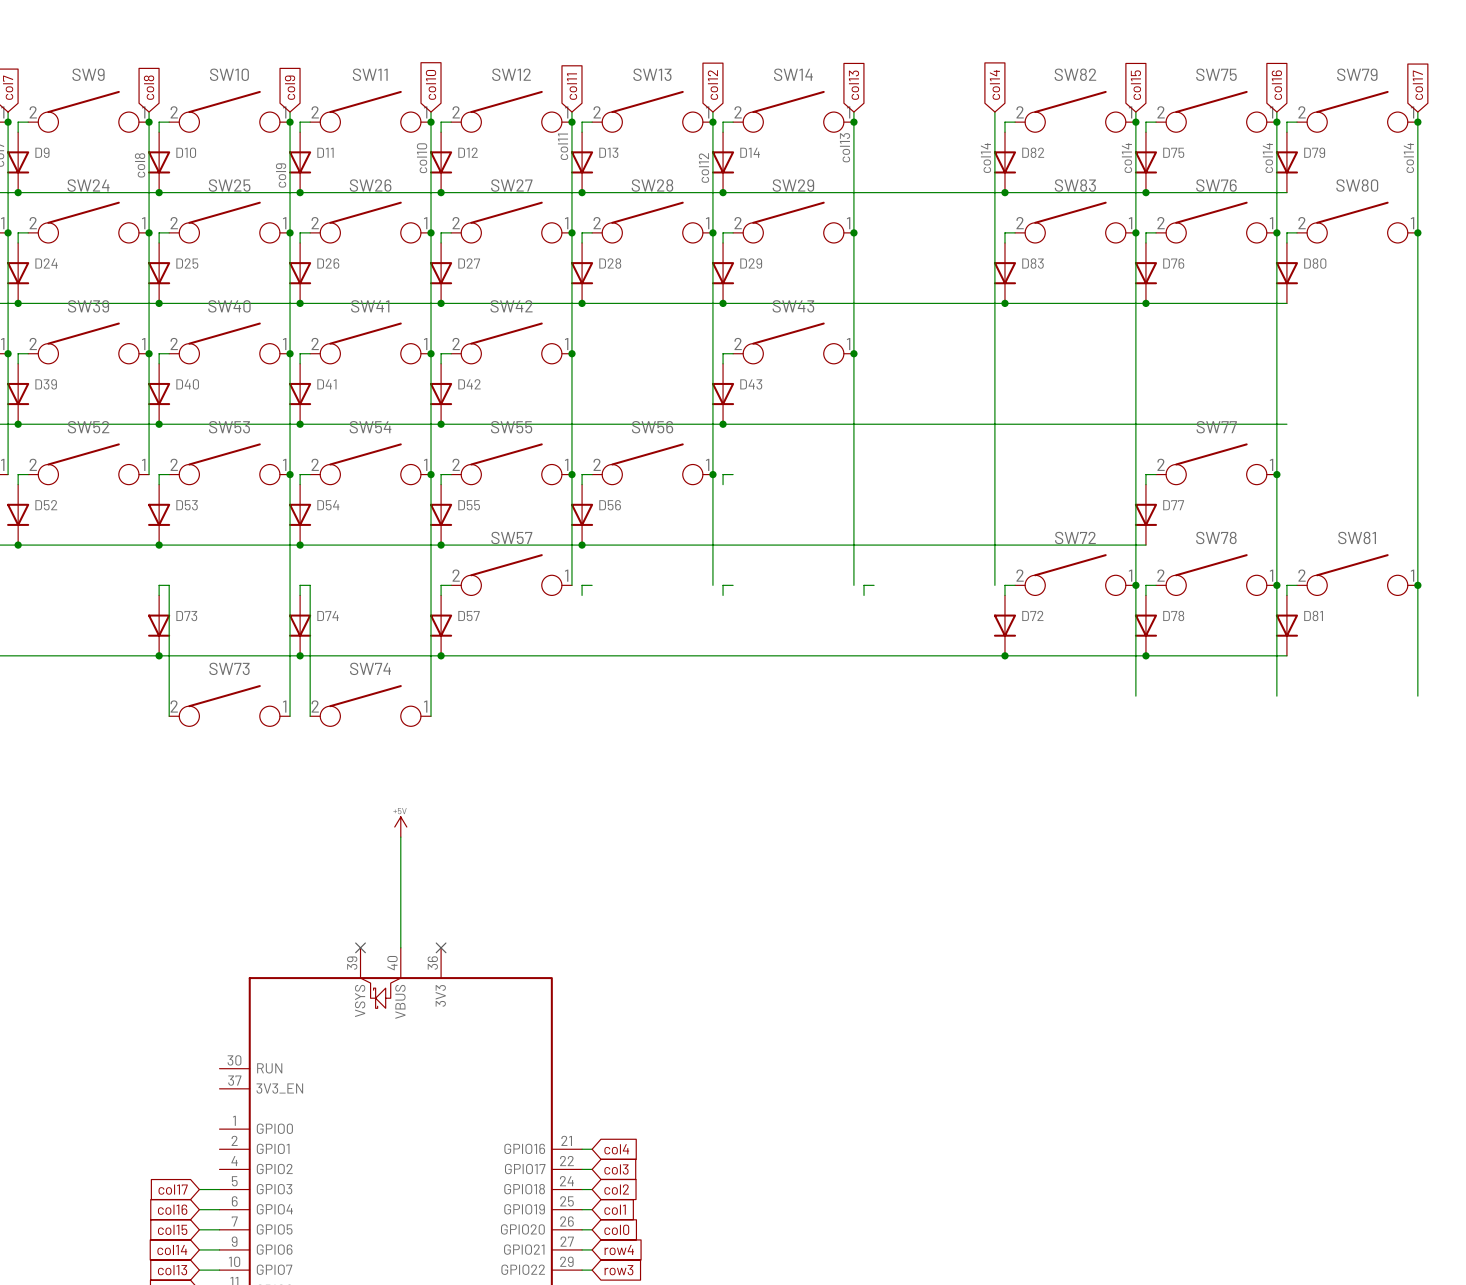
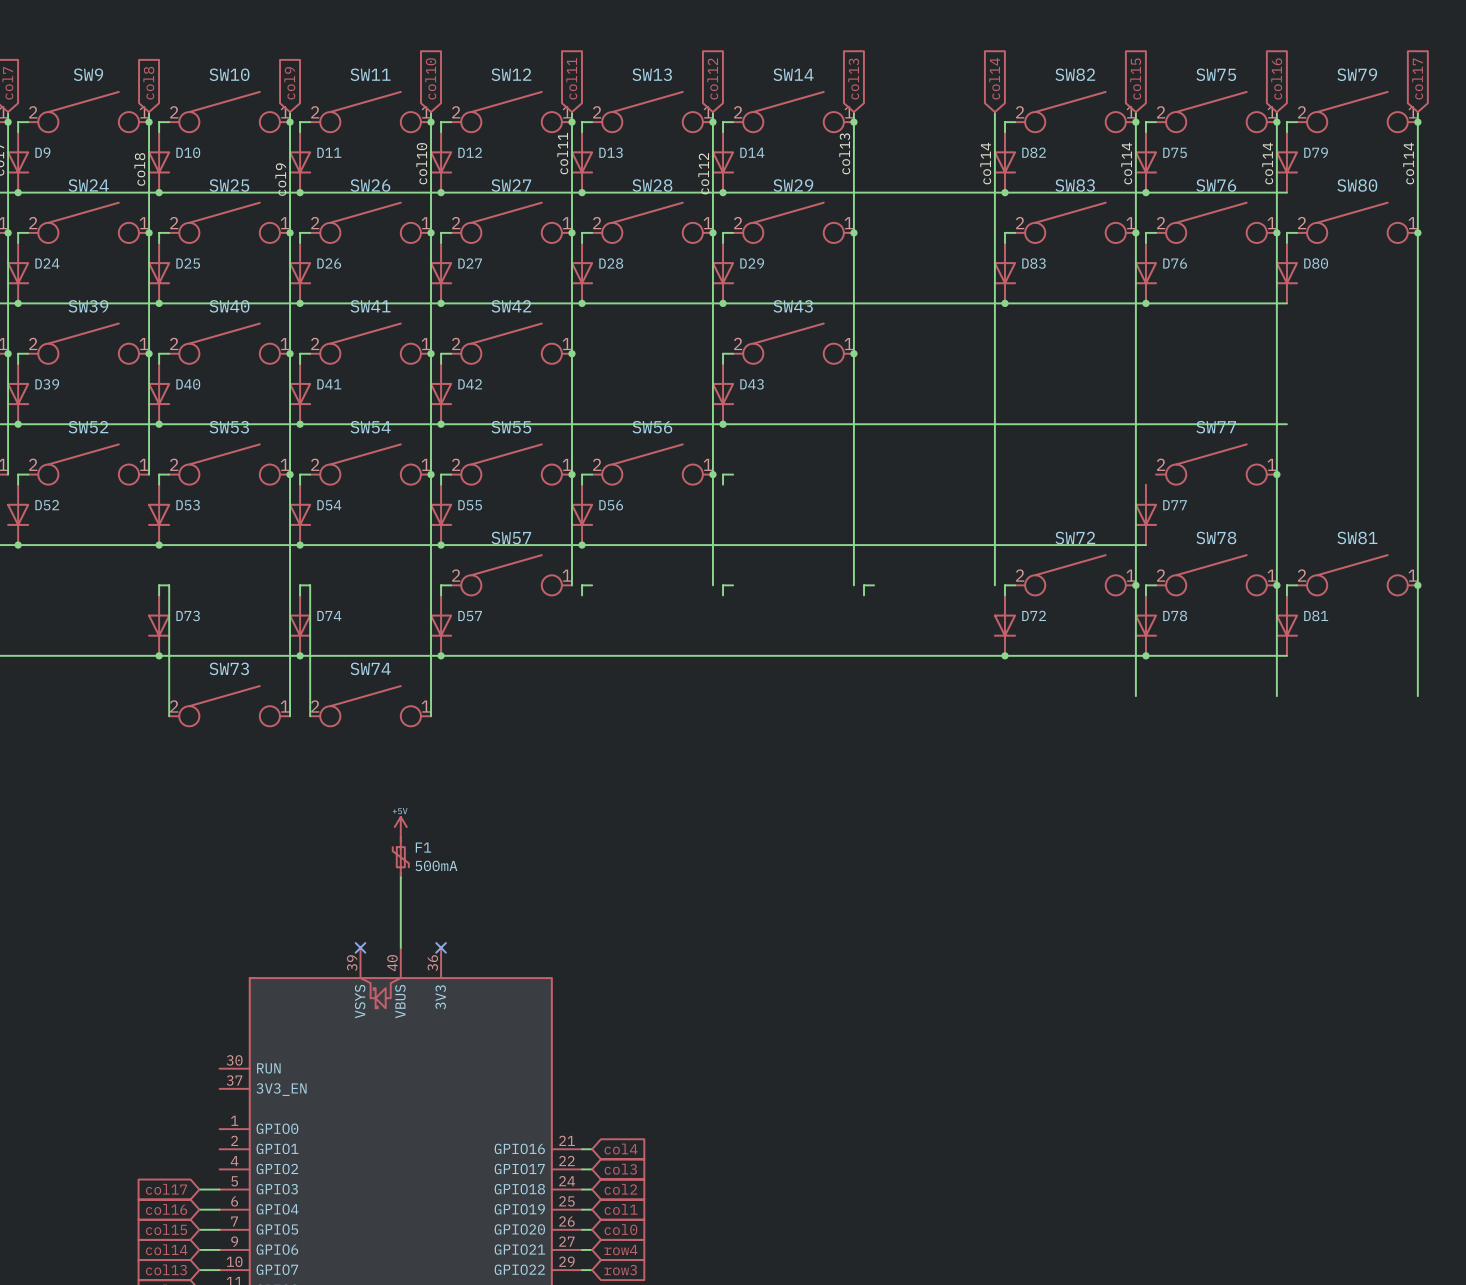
wire: (1156, 474) (1145, 474) (1145, 484) -> none
F1: none -> 500mA (400, 857)

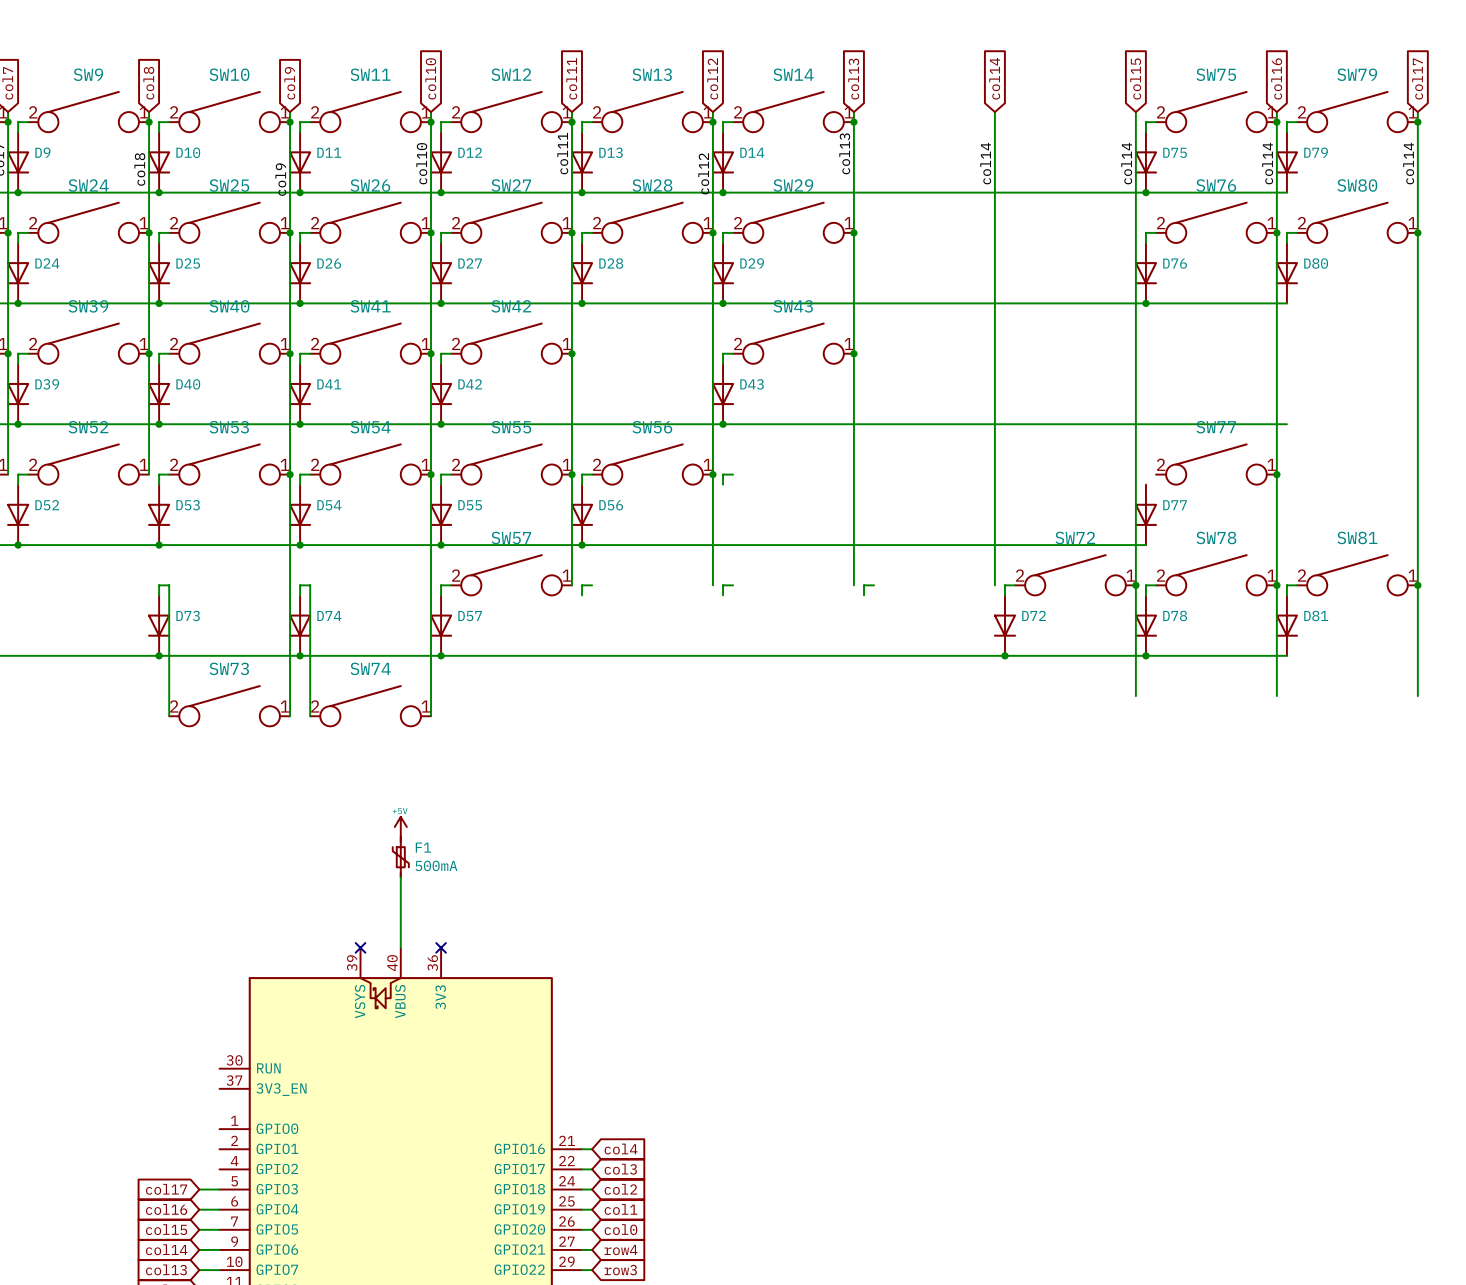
SW82: (1075, 111) -> none
wire: (1015, 122) (1004, 122) (1004, 132) -> none
junction: (1135, 122) -> none
D82: (1004, 162) -> none
junction: (1004, 192) -> none
SW83: (1075, 222) -> none
wire: (1015, 232) (1004, 232) (1004, 242) -> none
junction: (1135, 232) -> none
D83: (1004, 273) -> none
junction: (1004, 303) -> none

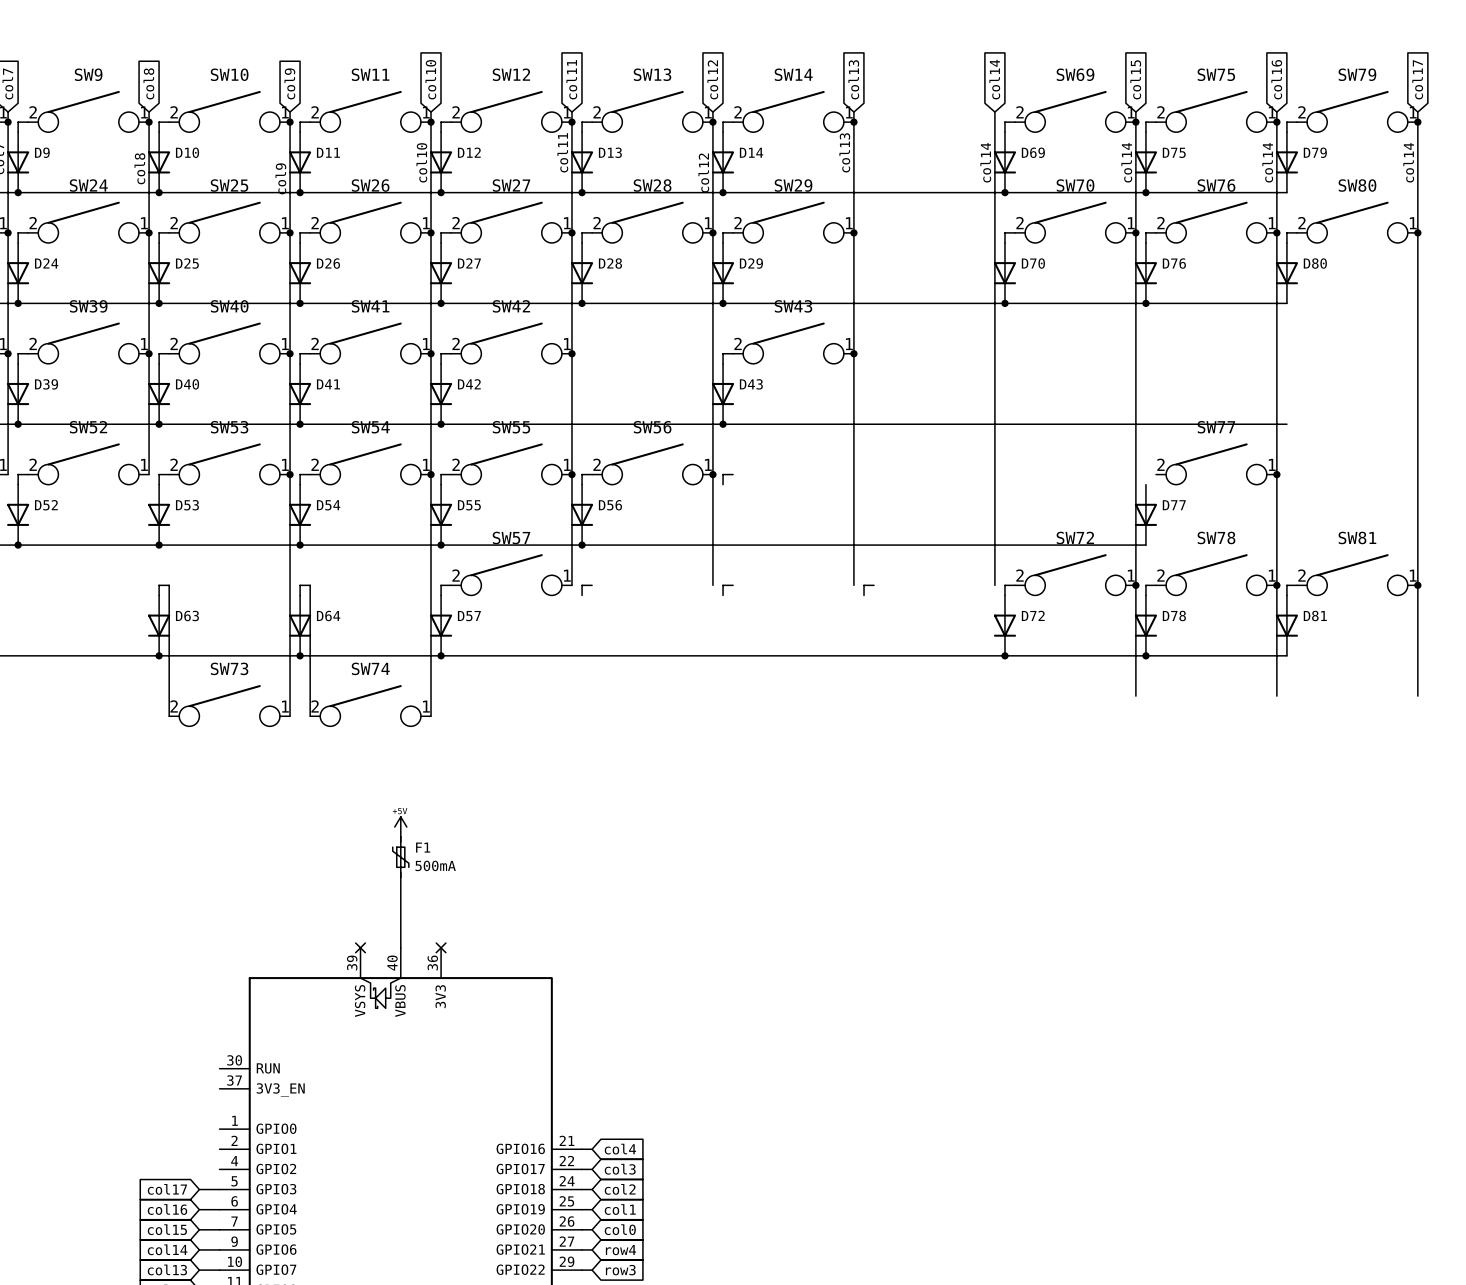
SW69: none -> (1075, 111)
wire: none -> (1015, 122) (1004, 122) (1004, 132)
junction: none -> (1135, 122)
D69: none -> (1004, 162)
junction: none -> (1004, 192)
SW70: none -> (1075, 222)
wire: none -> (1015, 232) (1004, 232) (1004, 242)
junction: none -> (1135, 232)
D70: none -> (1004, 273)
junction: none -> (1004, 303)
D73 name: D73 (188, 615) -> D63 (187, 615)
D74 name: D74 (329, 615) -> D64 (328, 615)

